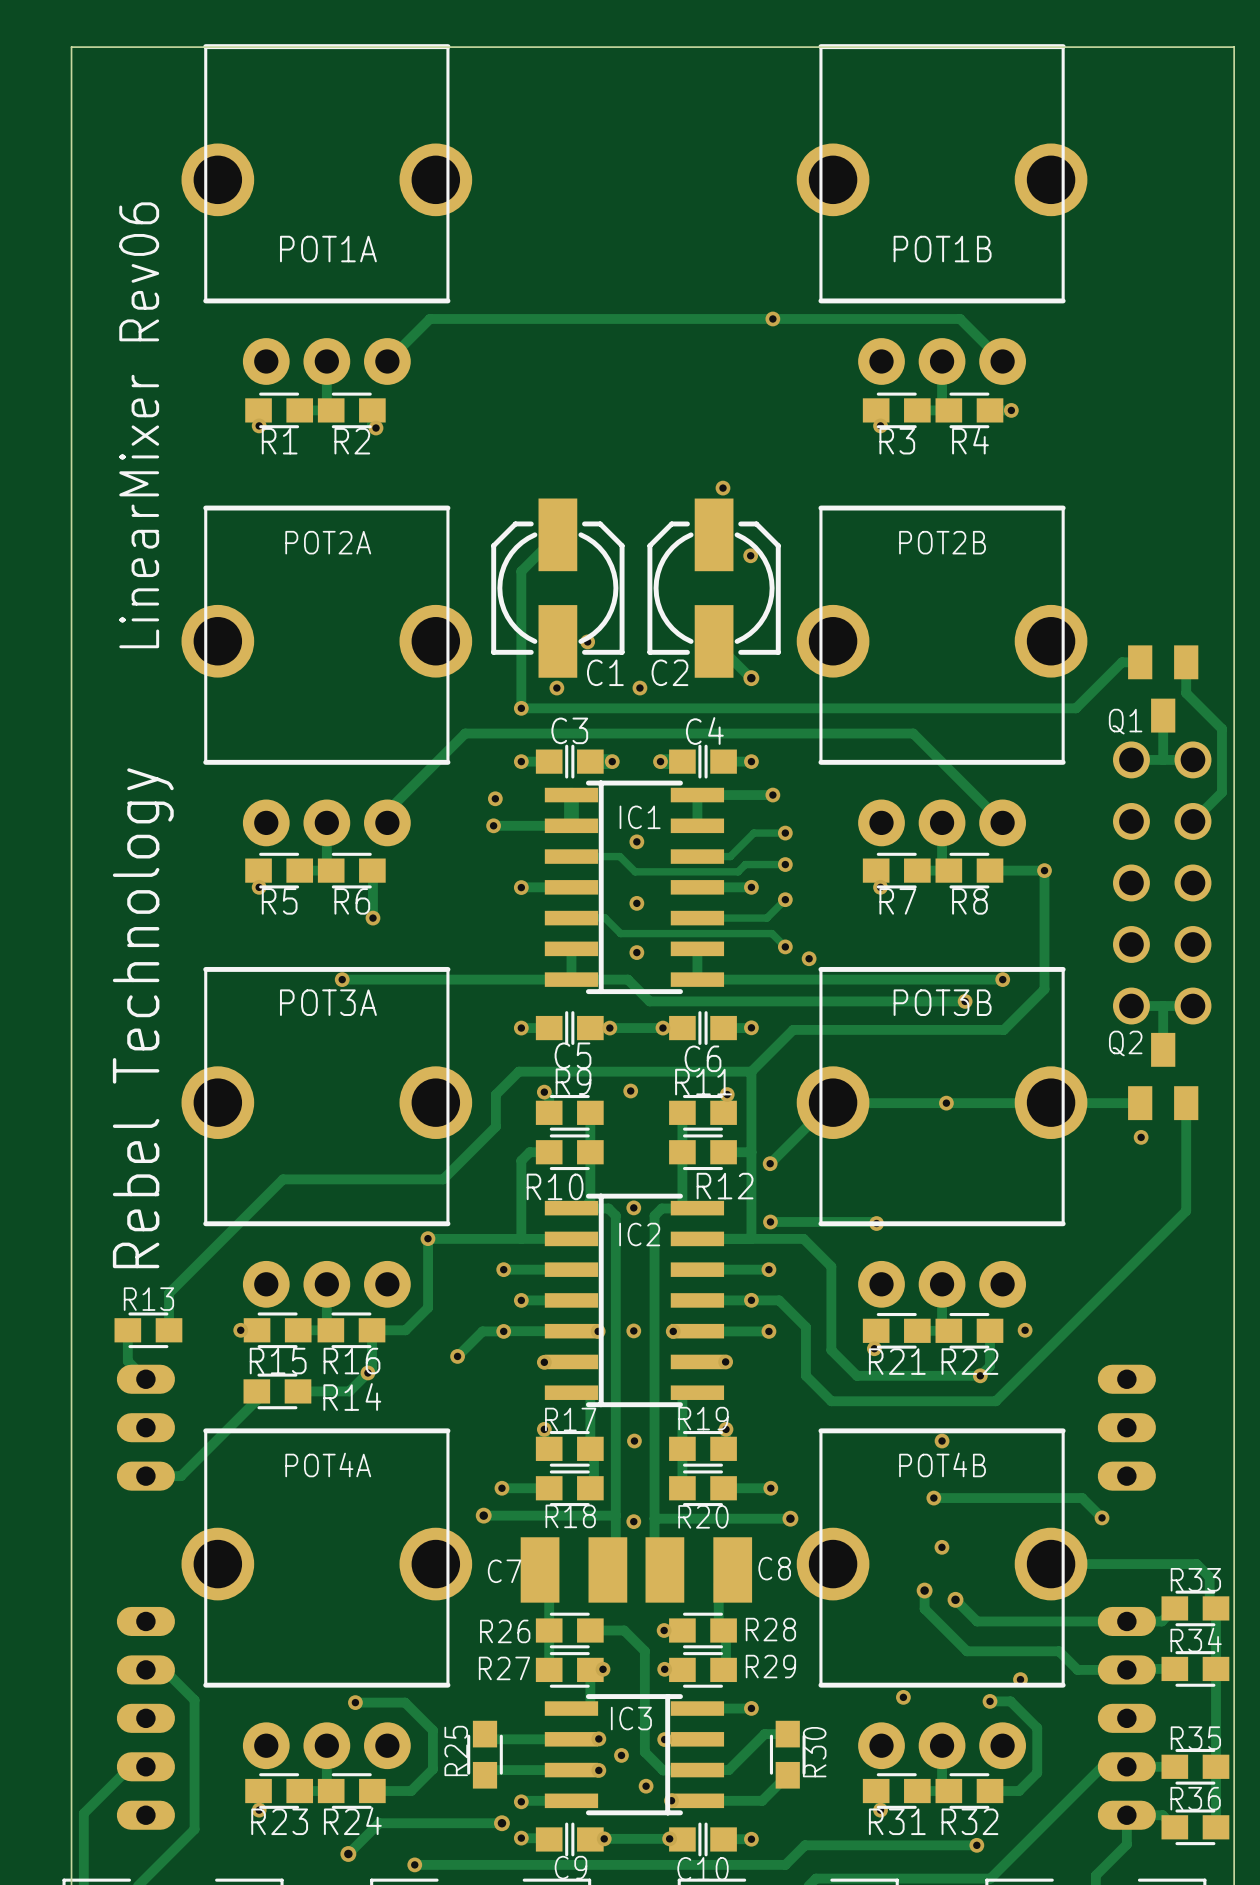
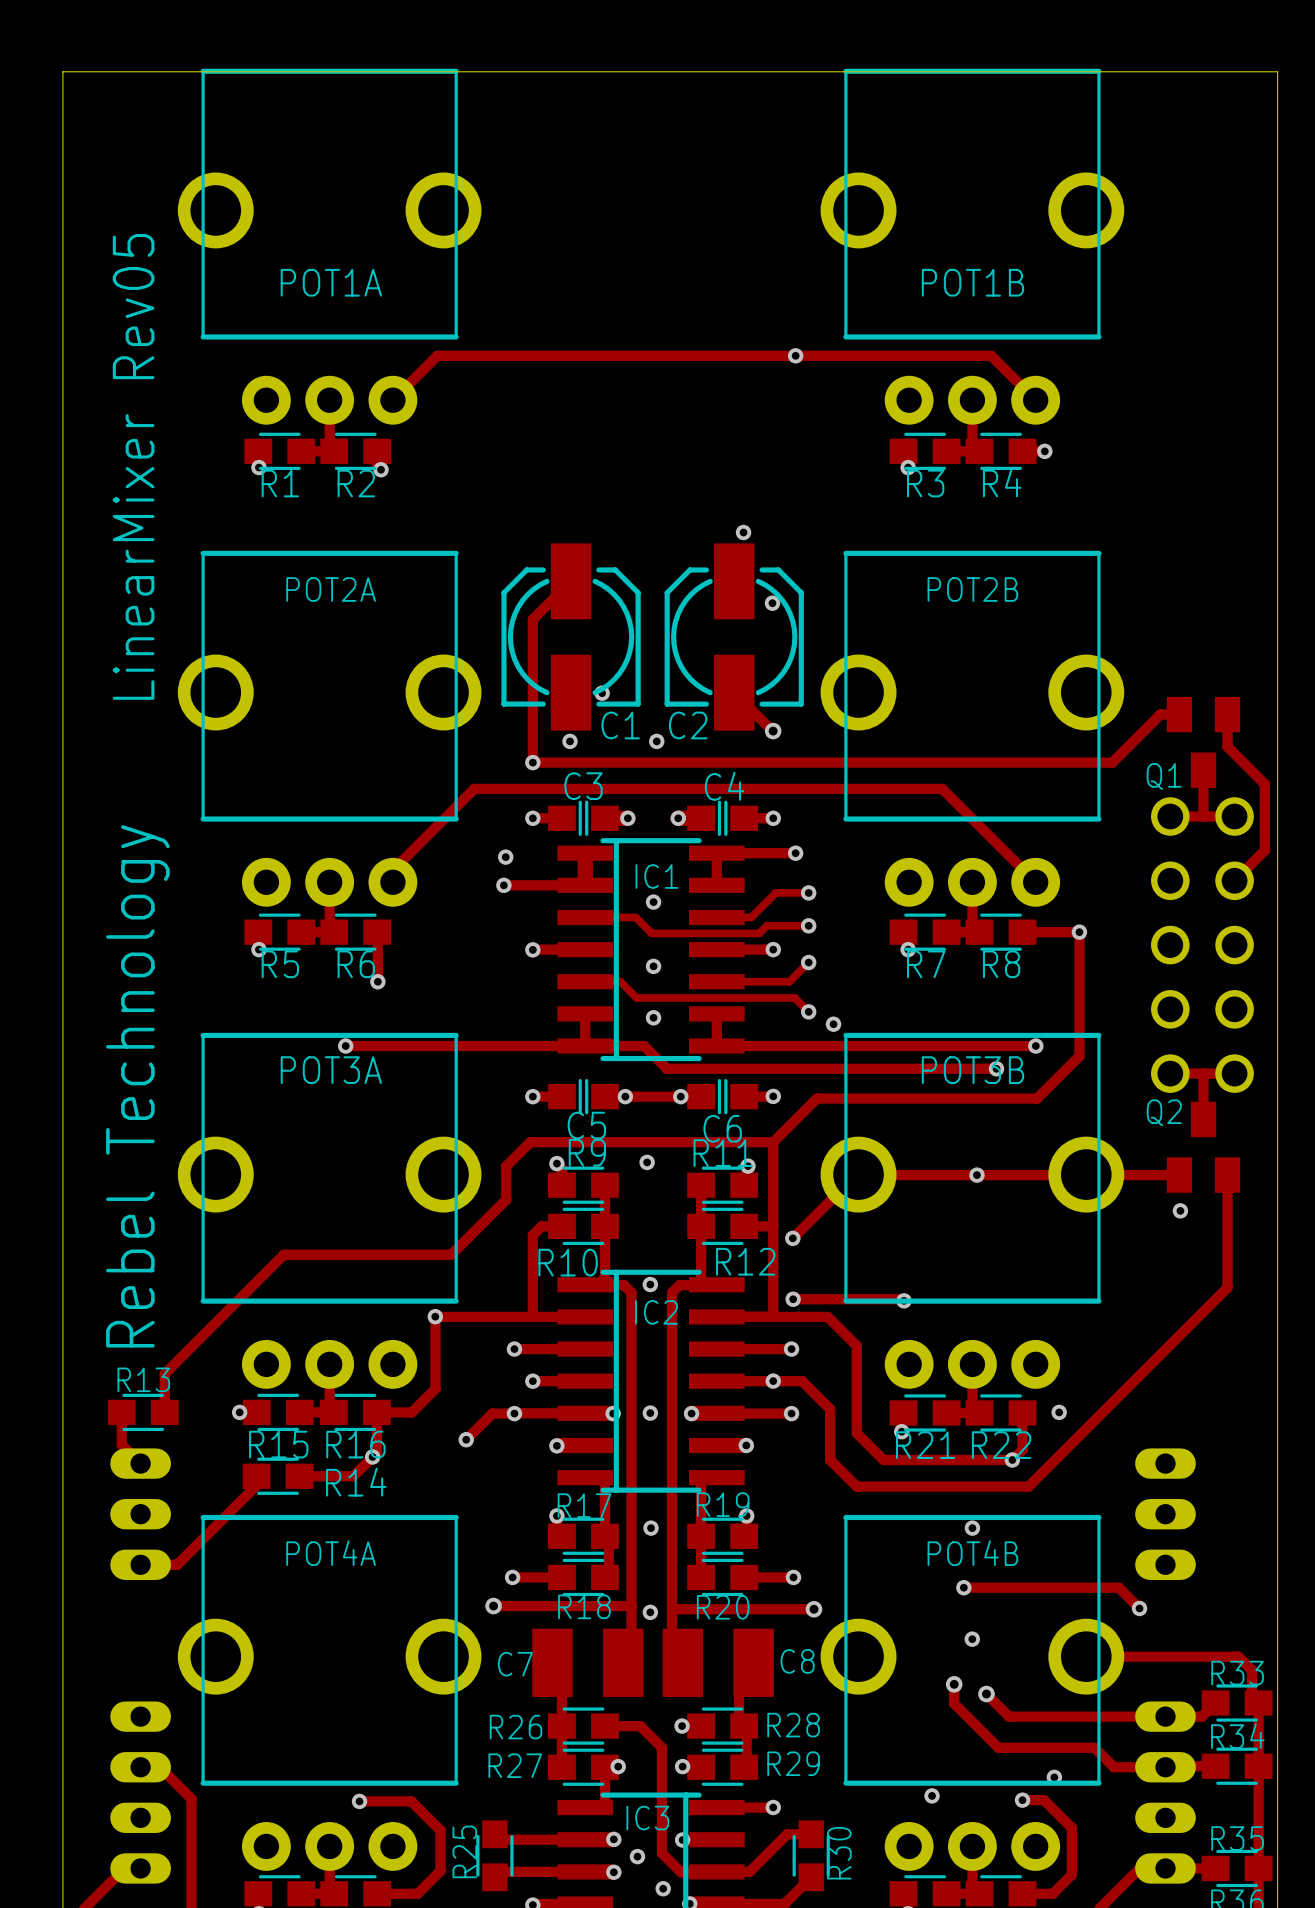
text: LinearMixer Rev06 (139, 425) -> LinearMixer Rev05 (133, 466)

